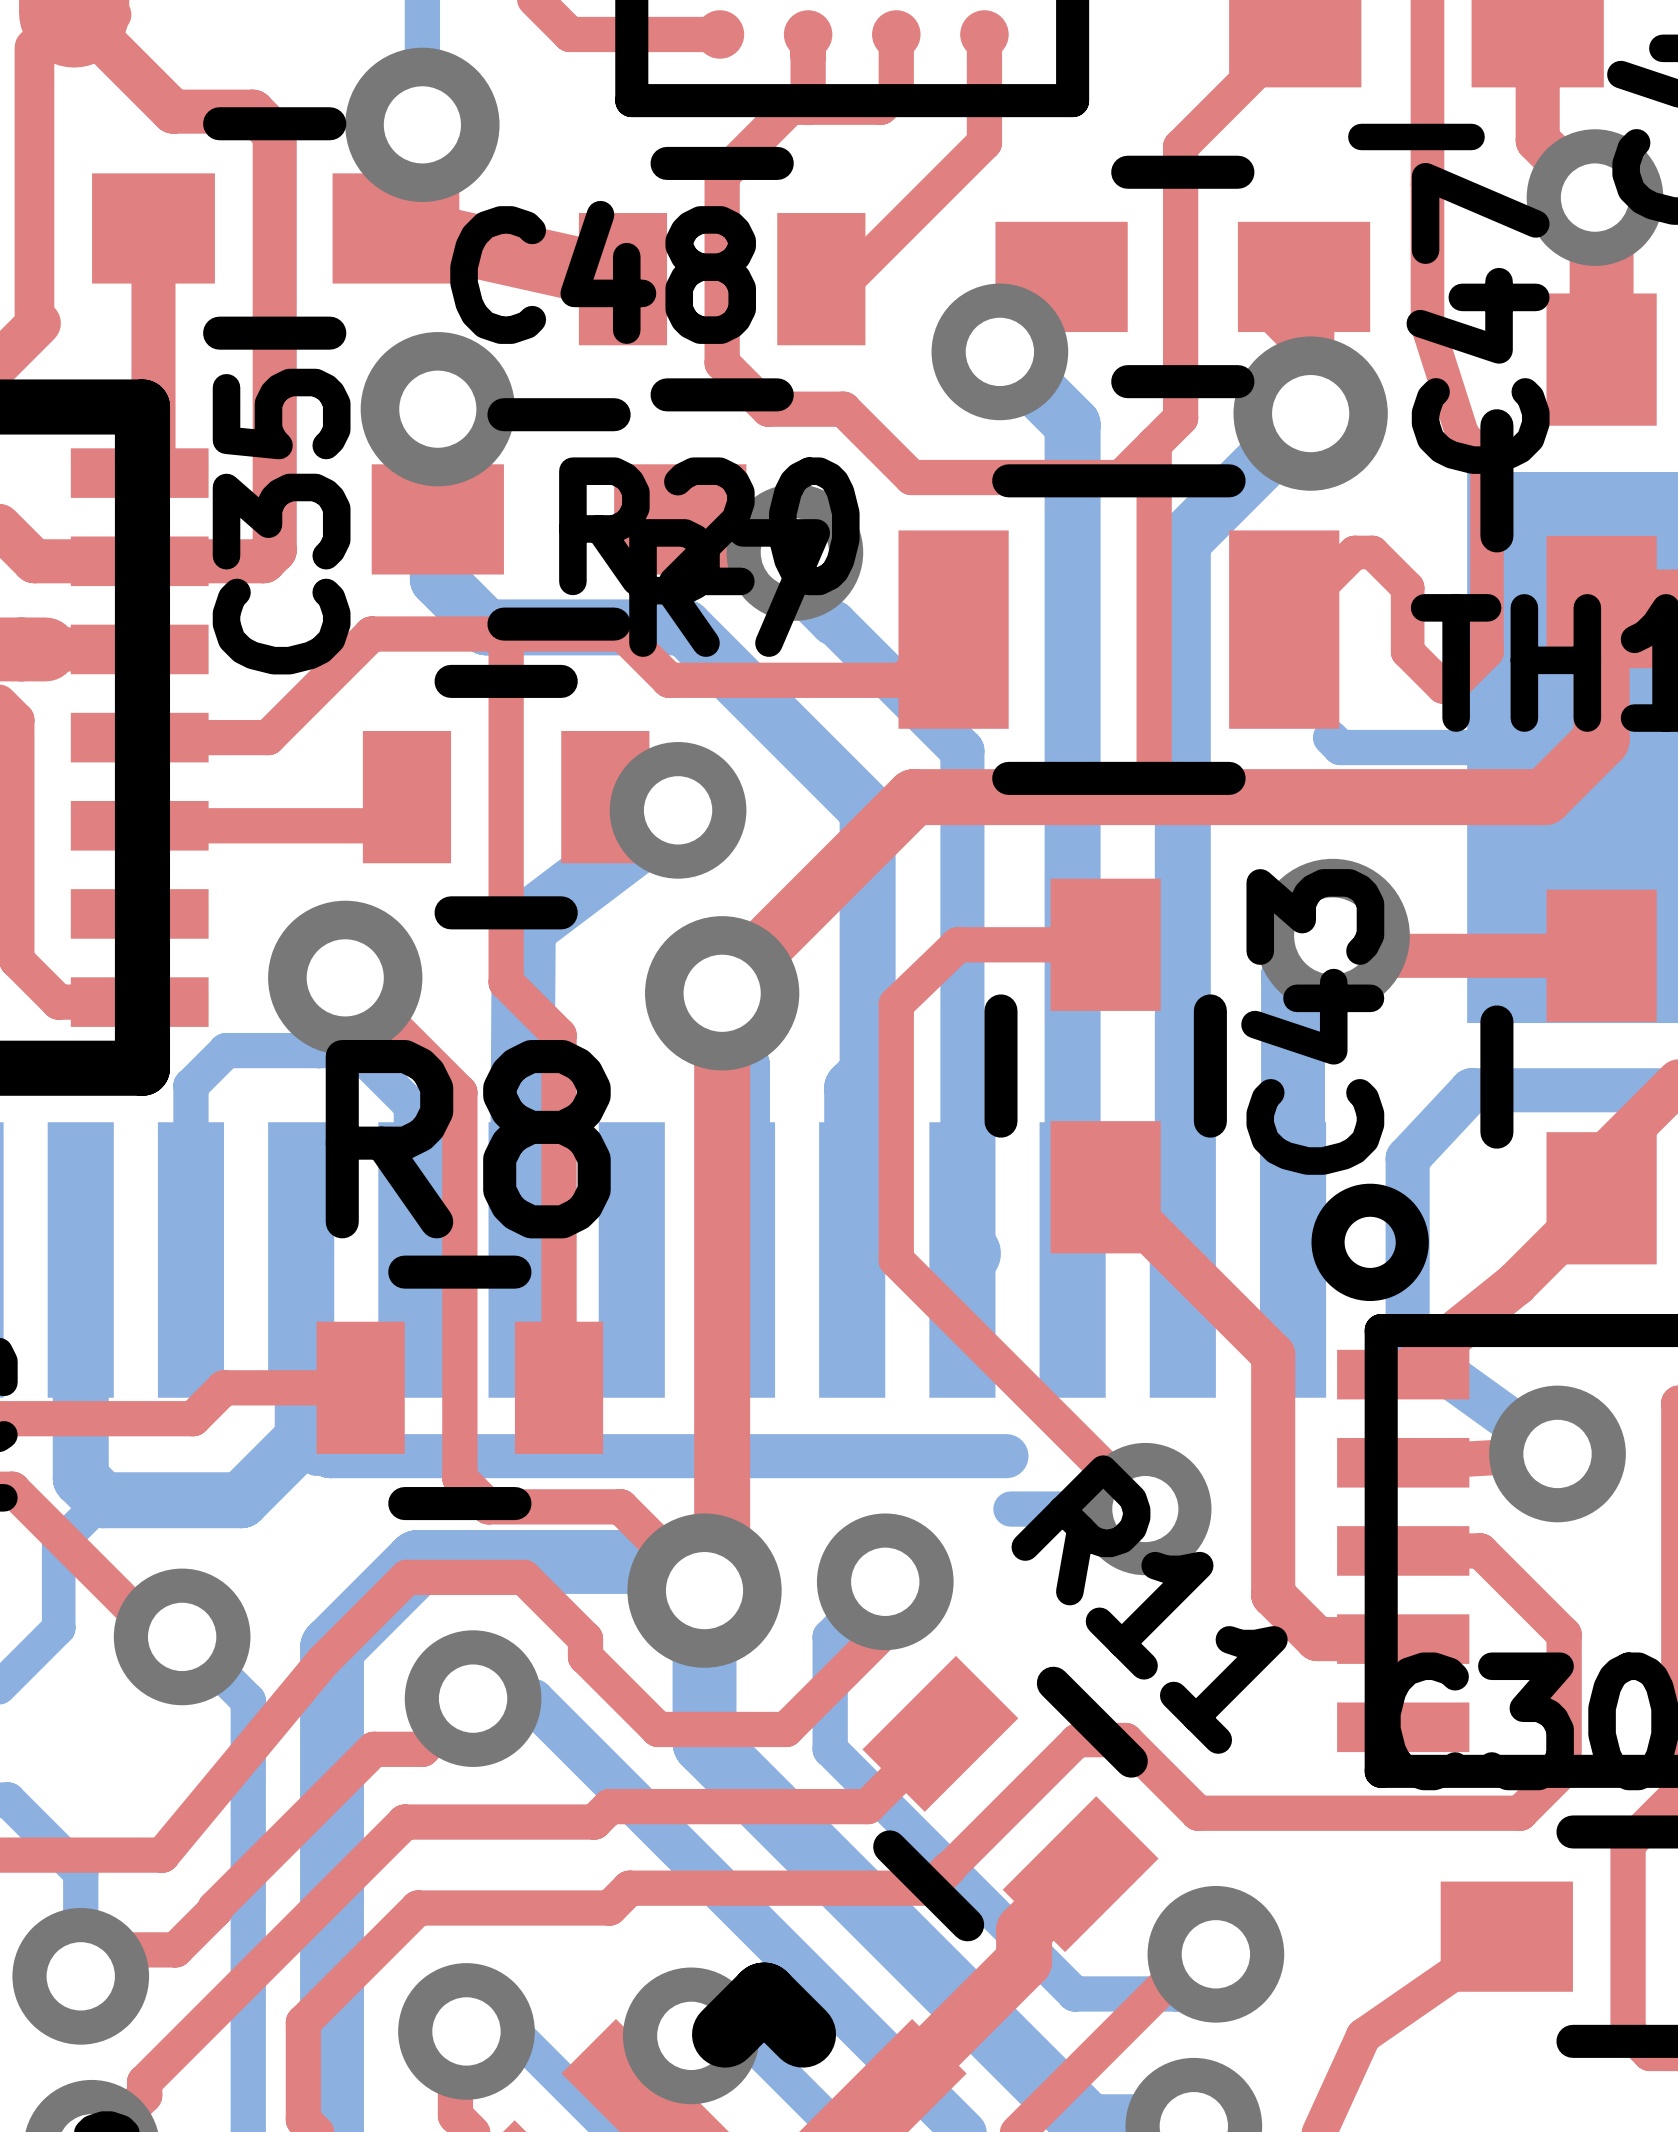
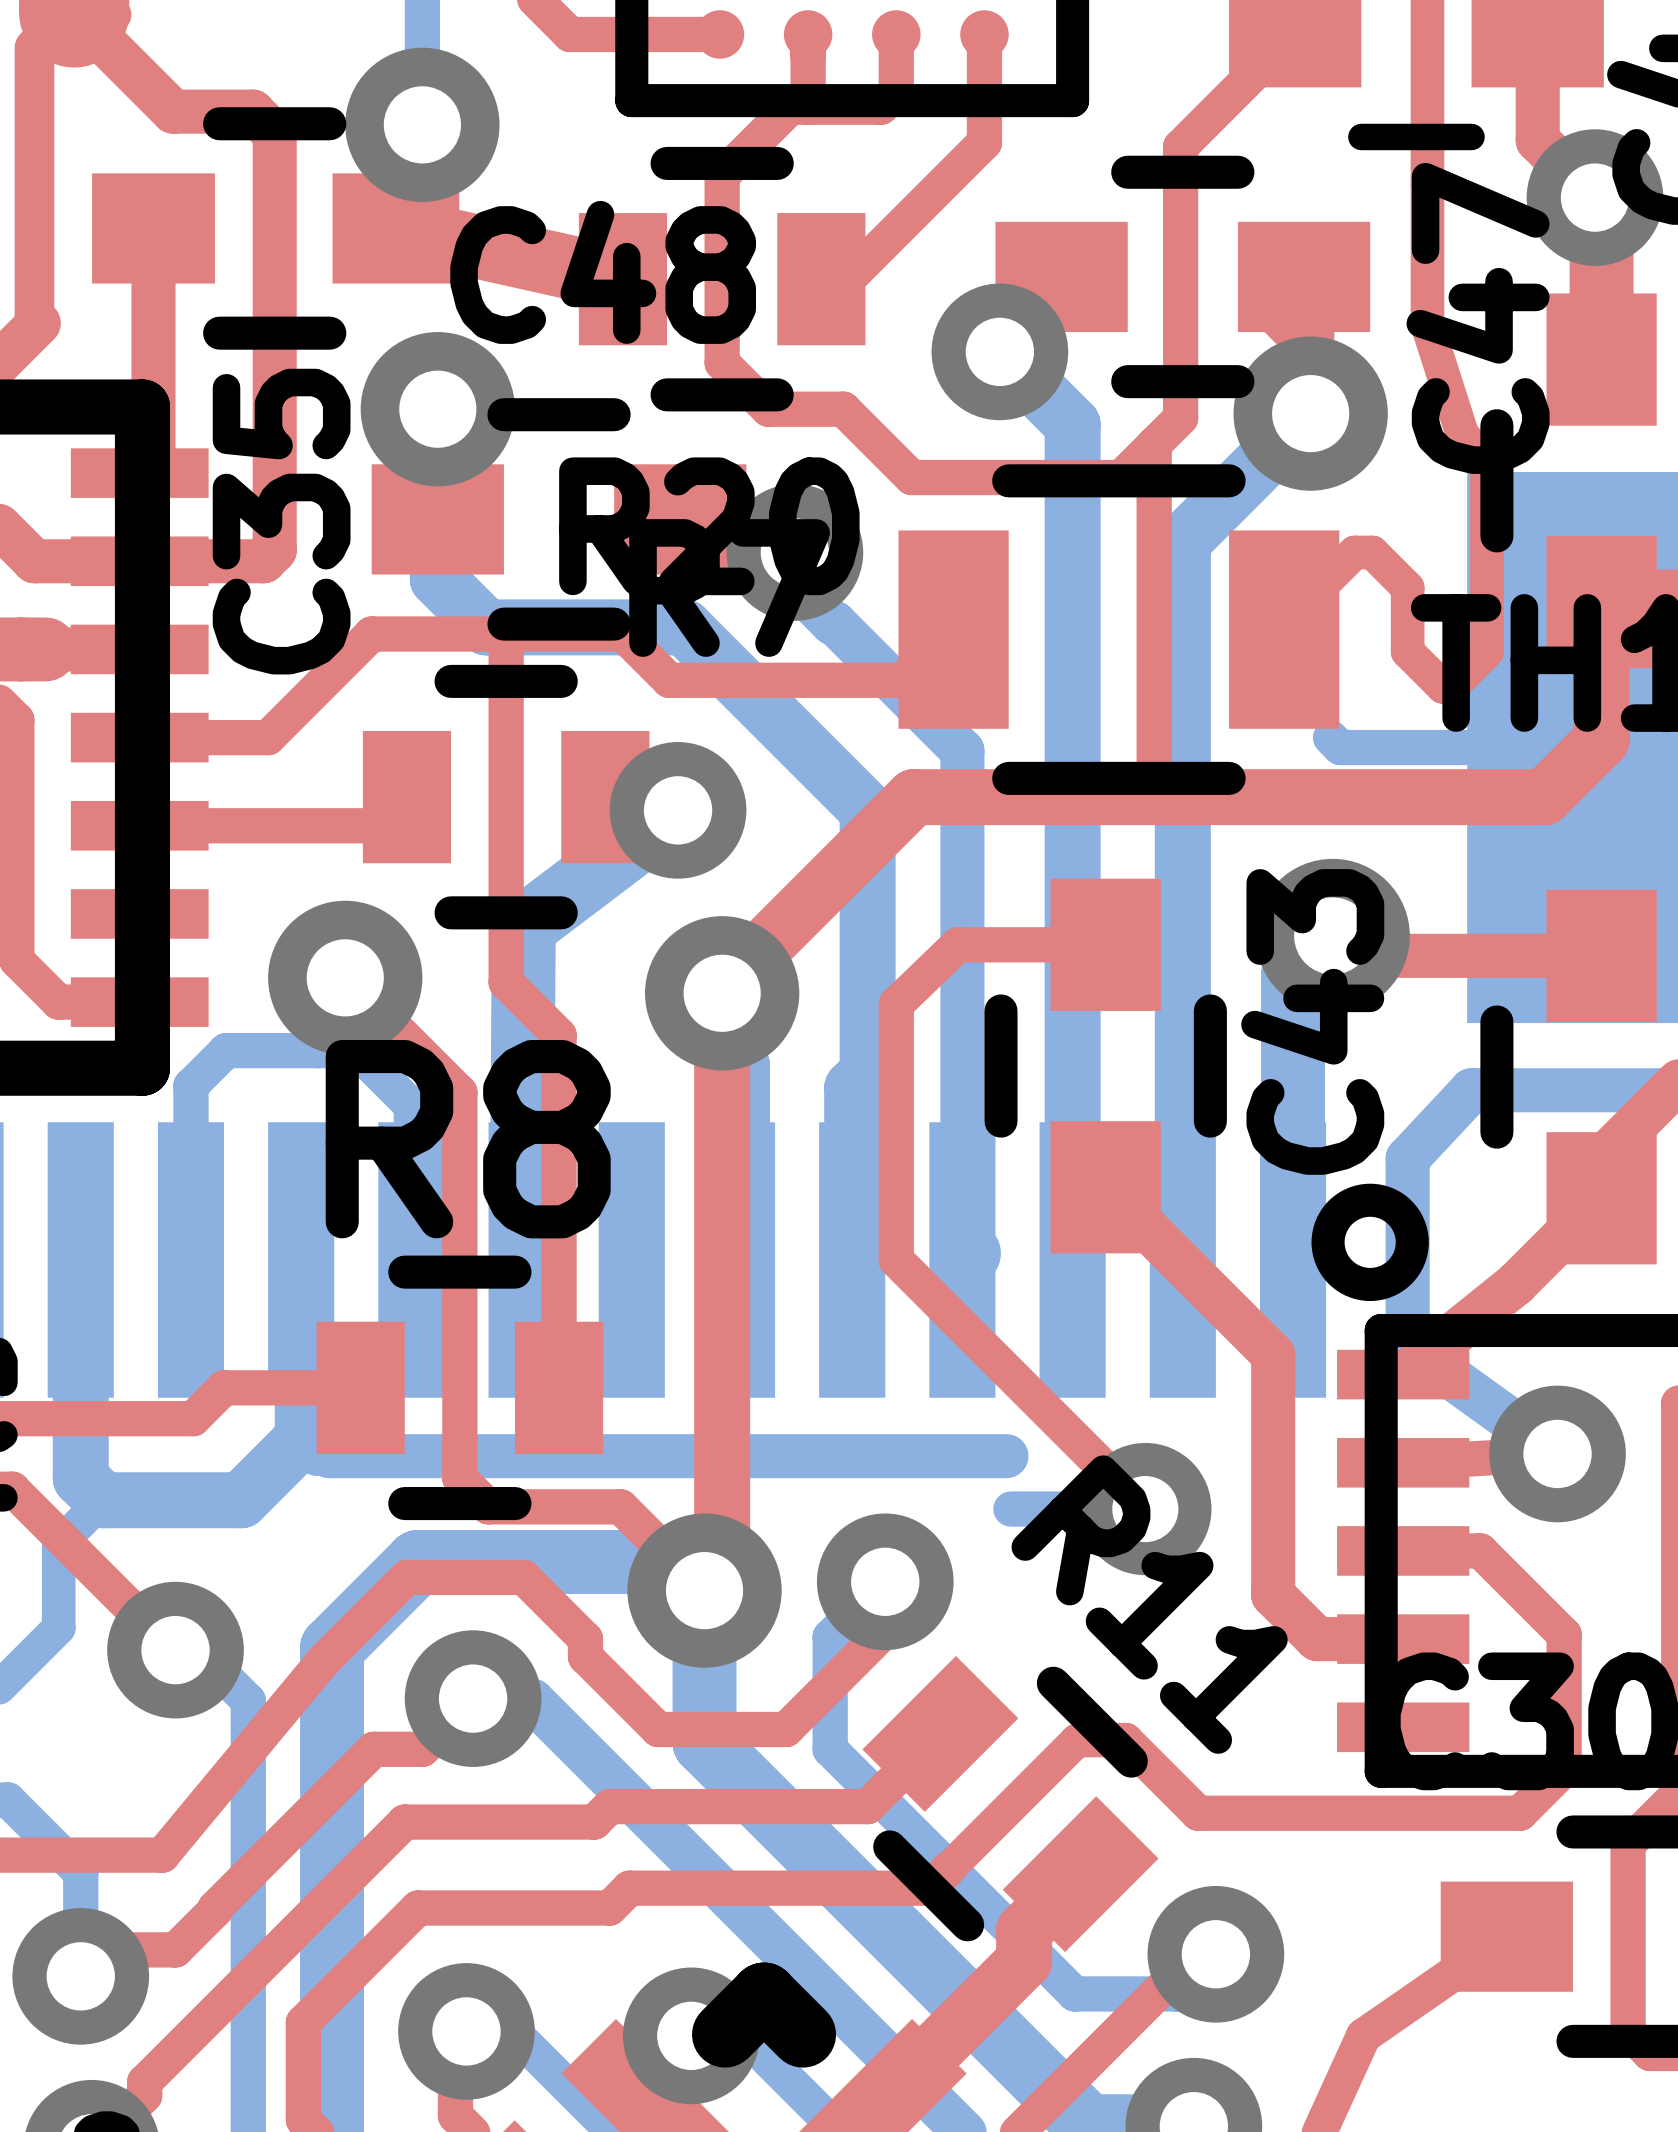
via position: (182, 1636) -> (175, 1650)

